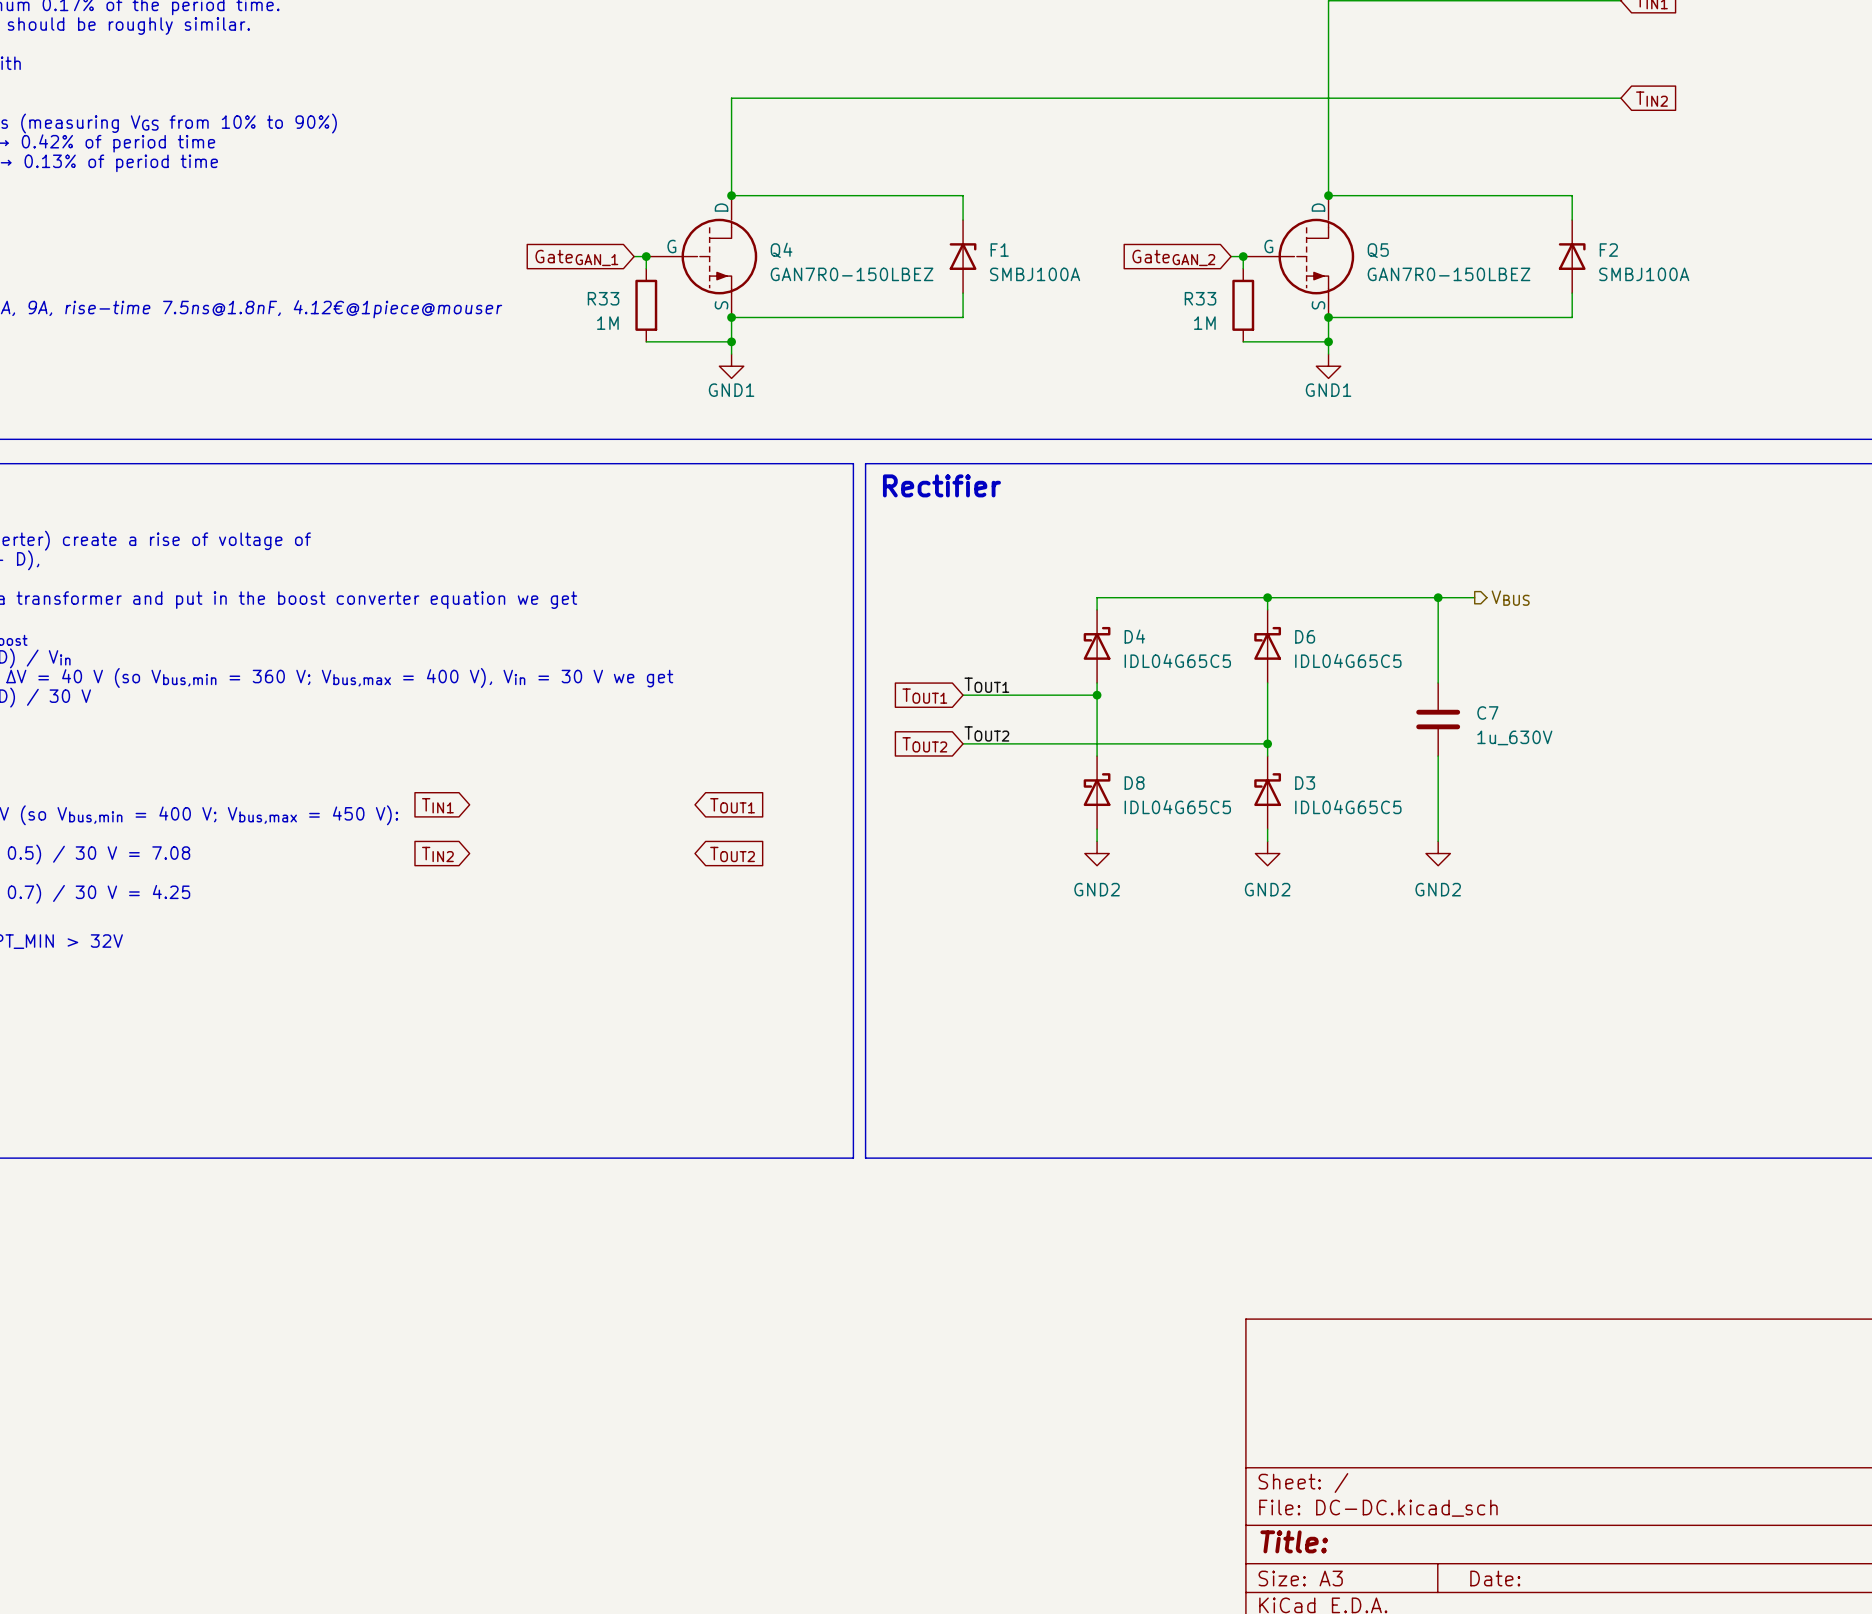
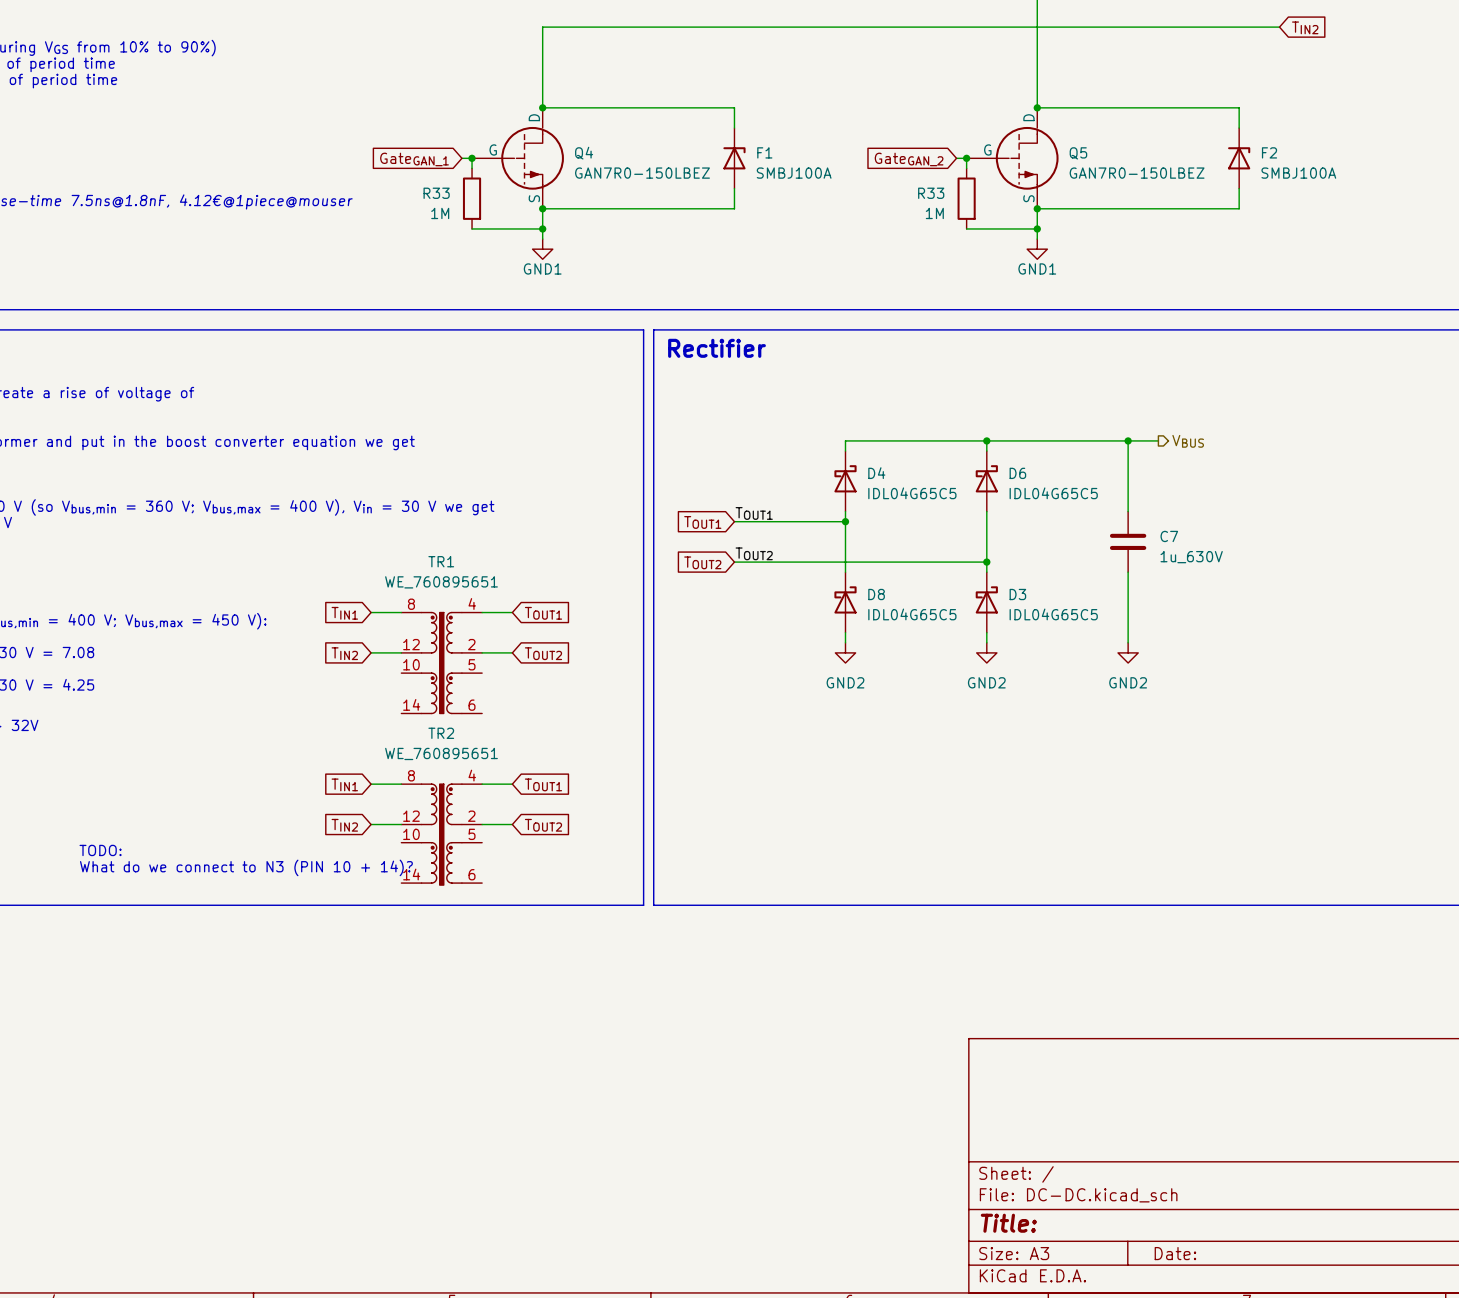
wire: none -> (371, 612) (401, 612)
wire: none -> (482, 612) (512, 612)
global label position: TIN1 (437, 805) -> TIN1 (344, 613)
wire: none -> (371, 652) (401, 652)
wire: none -> (482, 652) (512, 652)
global label position: TIN2 (437, 854) -> TIN2 (344, 653)
TR1: none -> WE_760895651 (441, 663)
wire: none -> (371, 784) (401, 784)
wire: none -> (482, 784) (512, 784)
global label: none -> TIN1 (344, 784)
global label: none -> TOUT1 (543, 784)
wire: none -> (371, 824) (401, 824)
wire: none -> (482, 824) (512, 824)
global label: none -> TIN2 (344, 825)
global label: none -> TOUT2 (543, 825)
TR2: none -> WE_760895651 (441, 834)
text: none -> TODO: (100, 850)
text: none -> What do we connect to N3 (PIN 10 + 14)? (246, 867)

